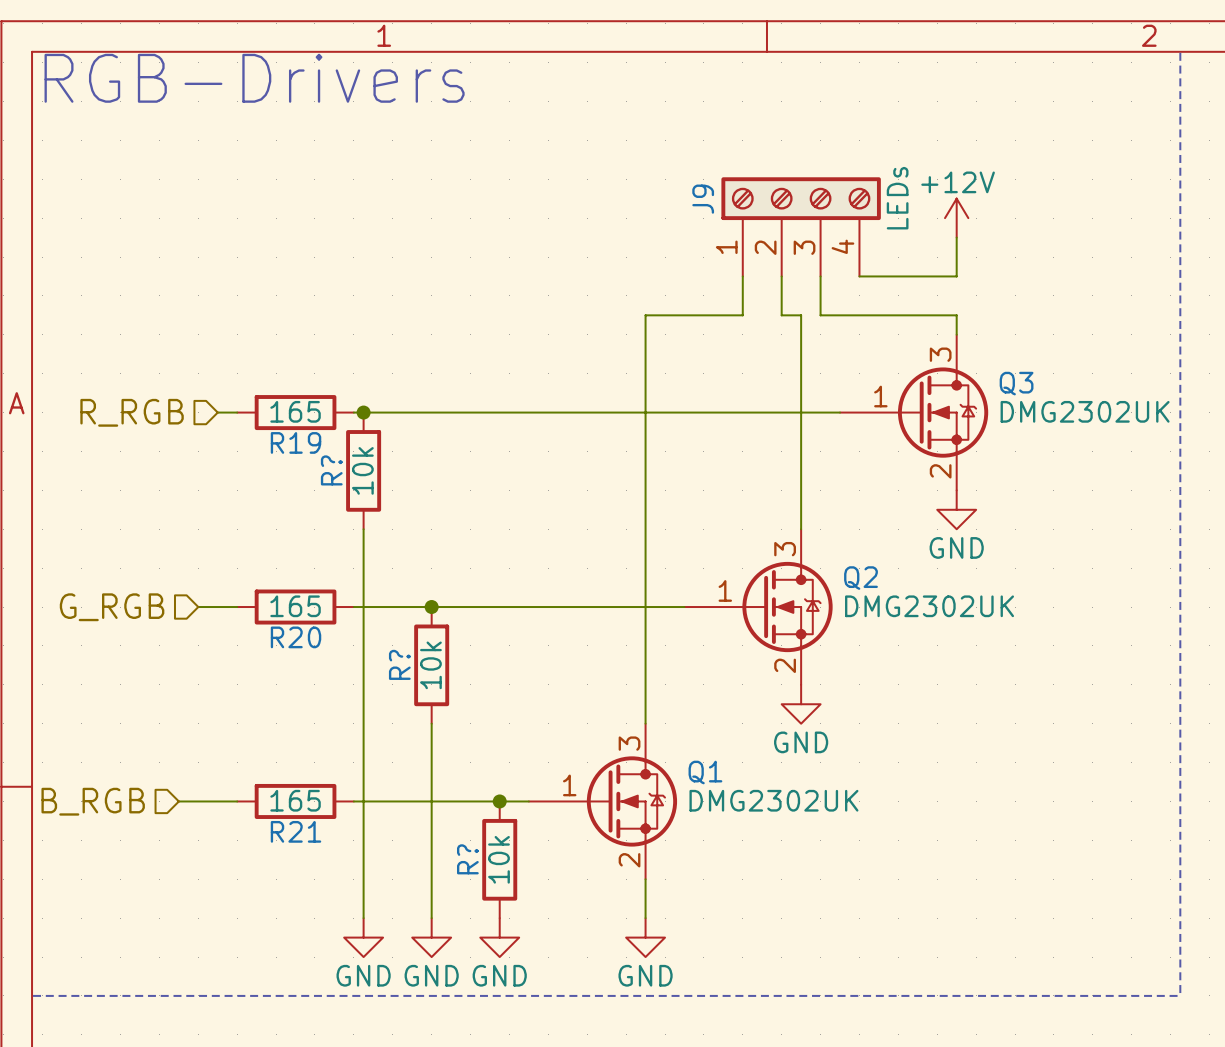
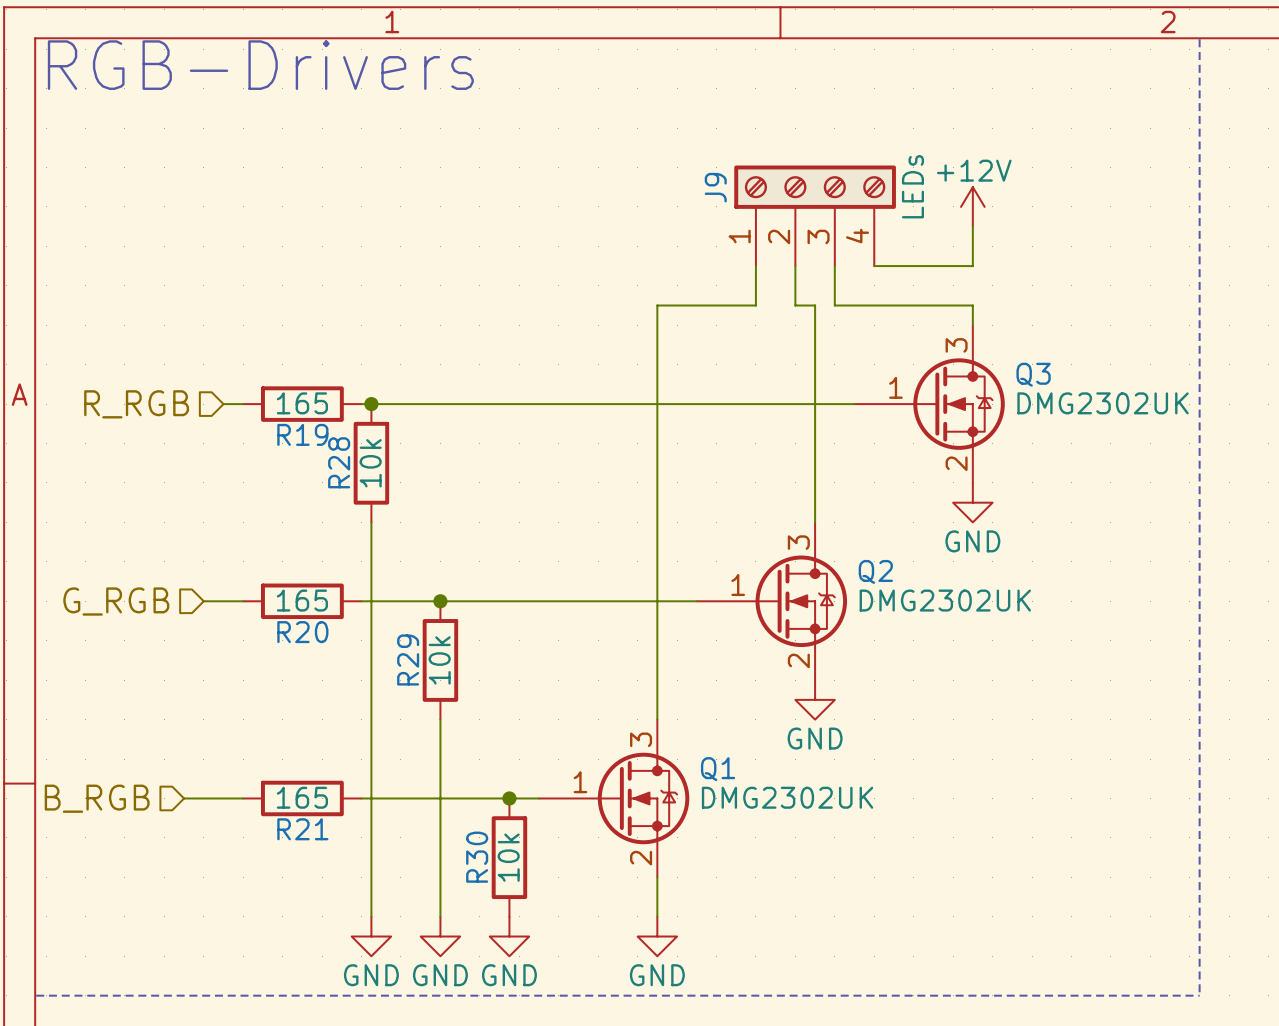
R? name: R? (331, 470) -> R28 (339, 462)
R? name: R? (399, 664) -> R29 (408, 659)
R? name: R? (467, 859) -> R30 (477, 857)

